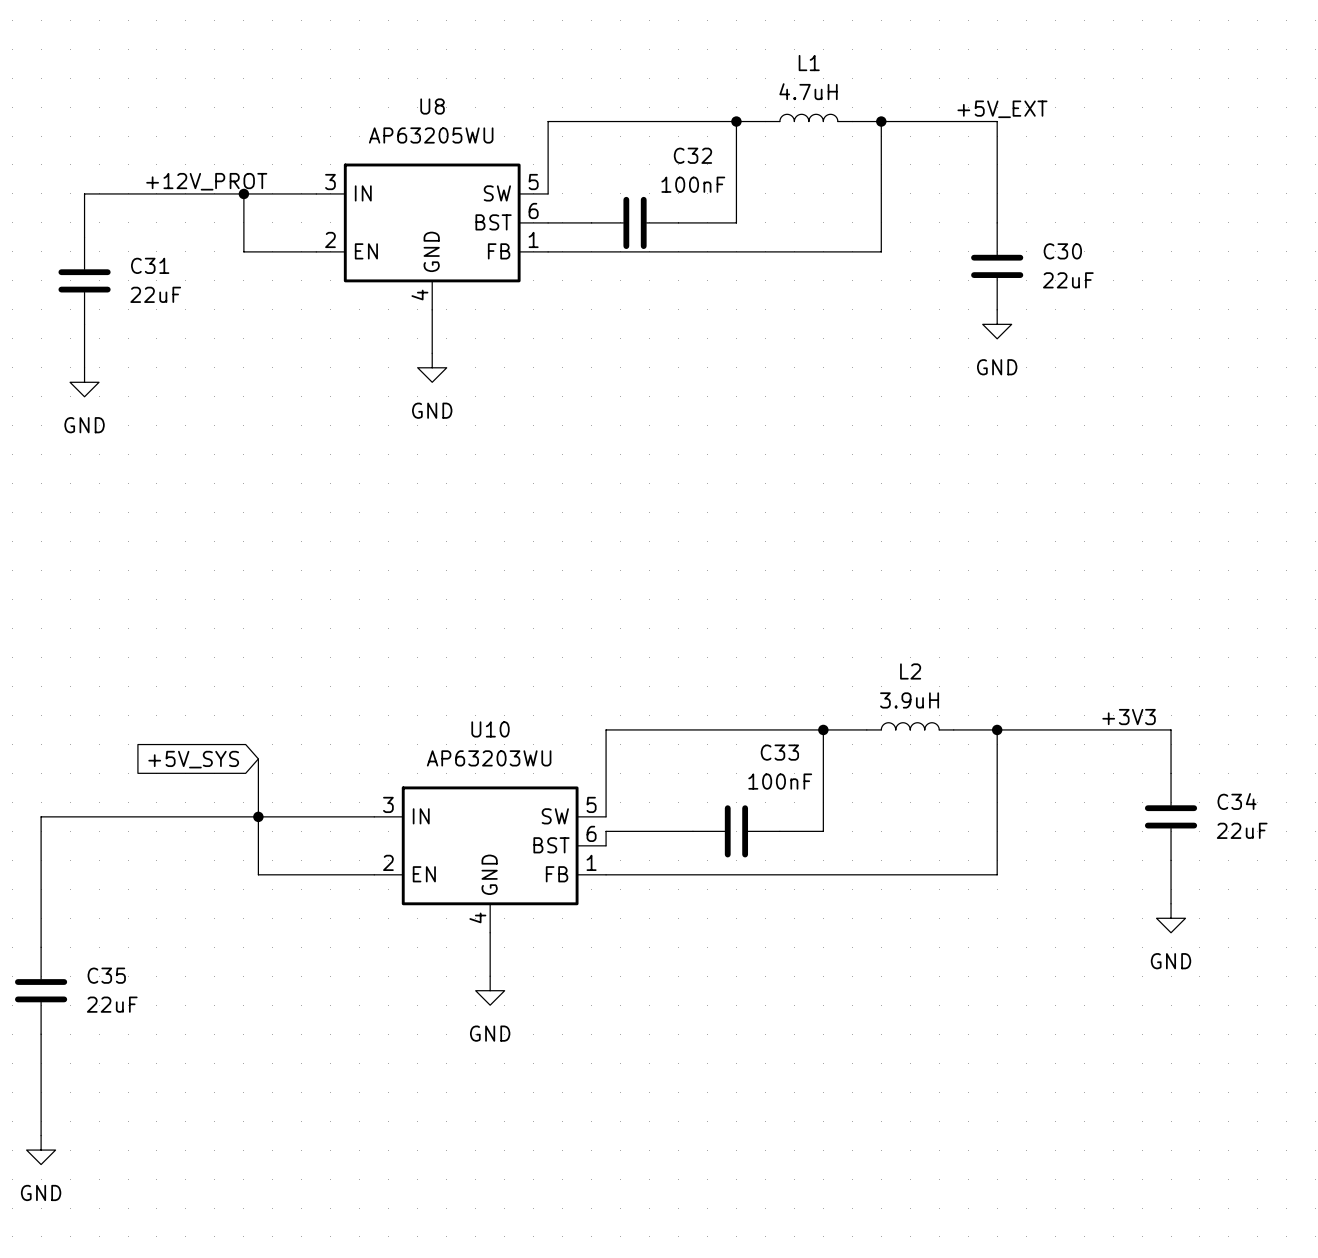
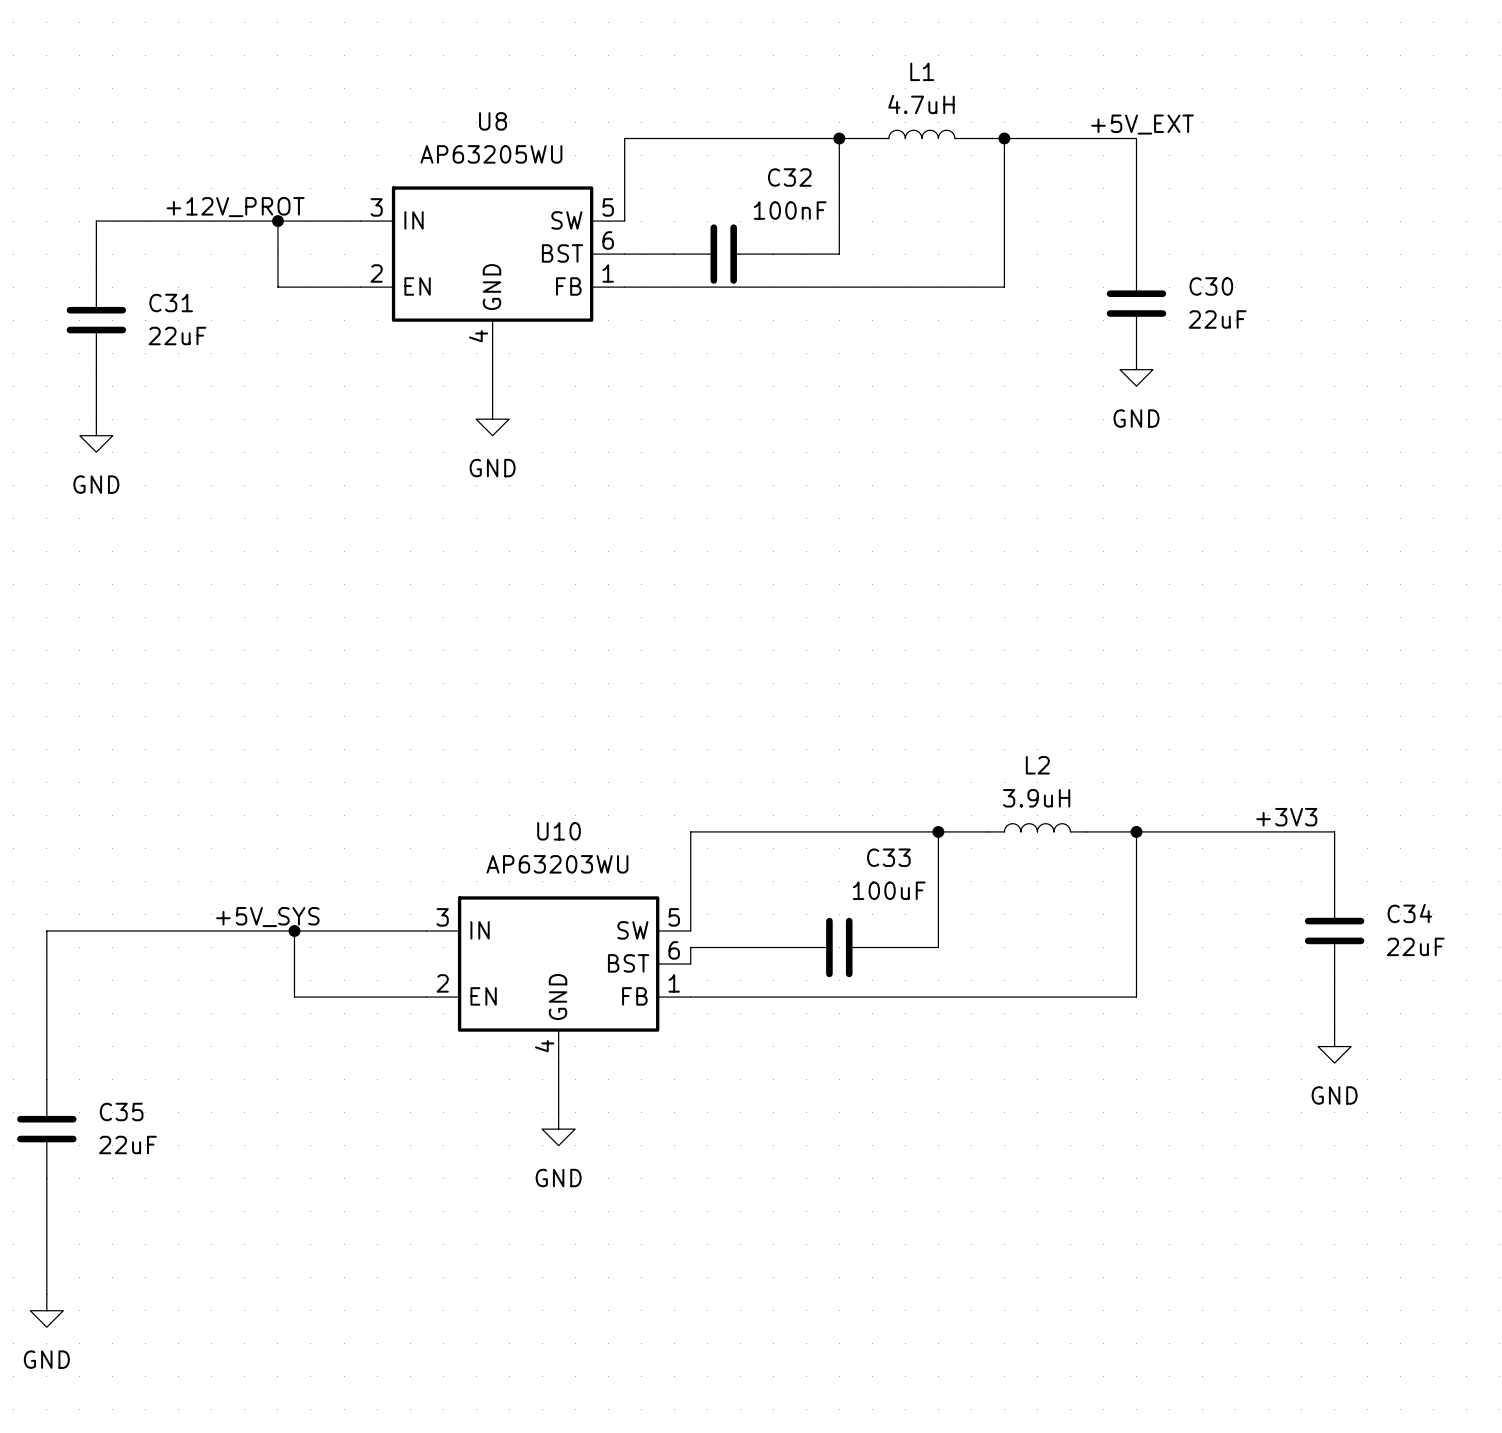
wire: (258, 758) (258, 816) -> none
global label: +5V_SYS (193, 759) -> none
C33 value: 100nF (780, 781) -> 100uF (889, 890)
label: none -> +5V_SYS (267, 917)

